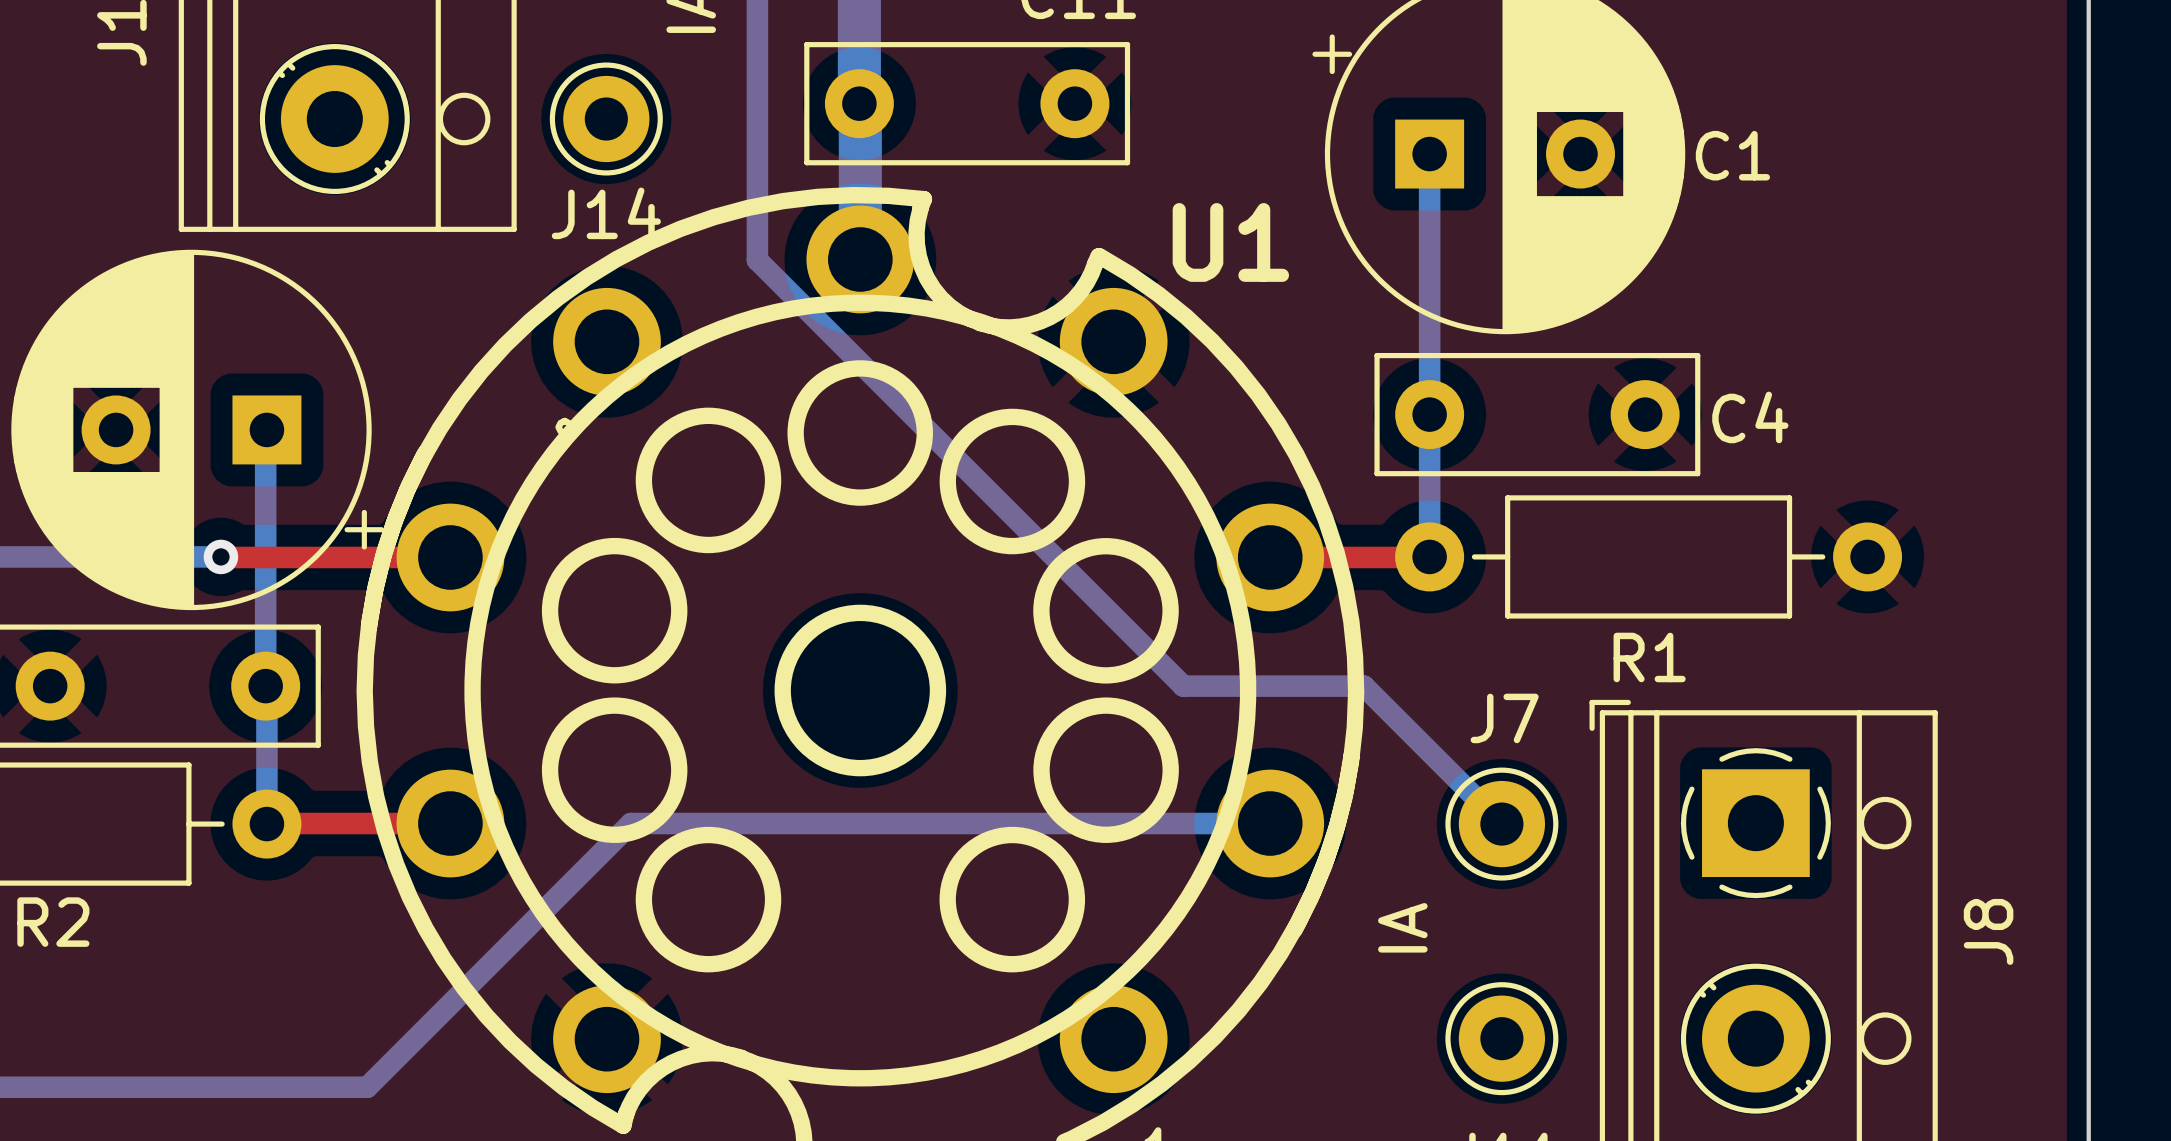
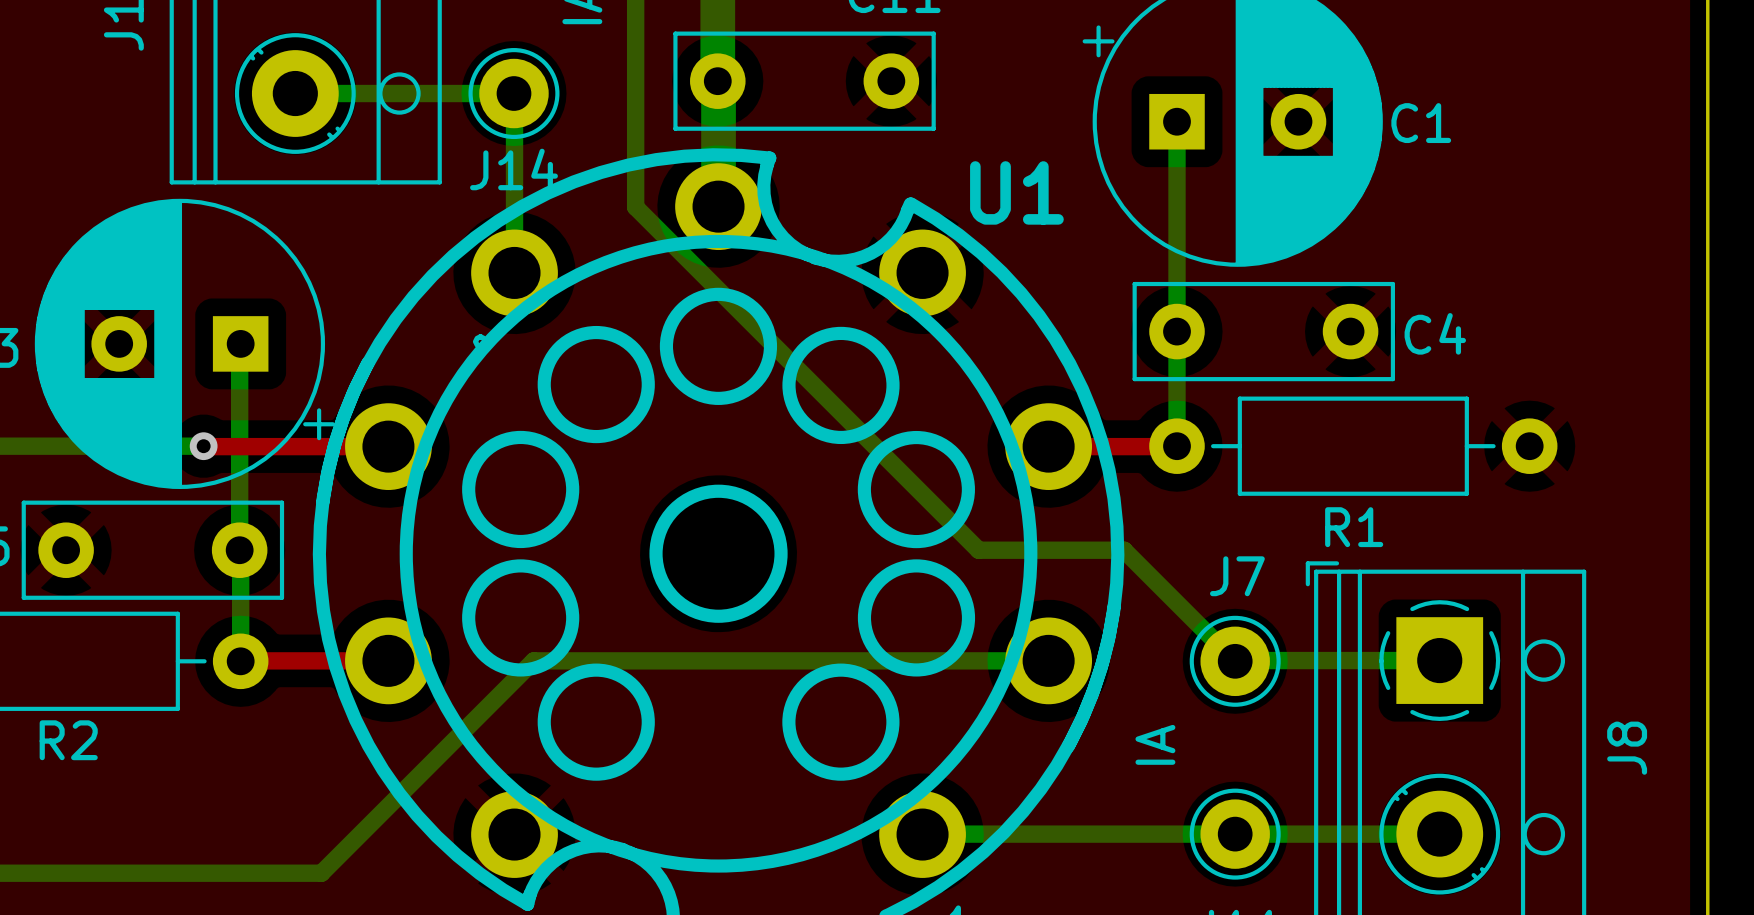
bottom track: none -> (295, 93) (513, 93) (514, 272)
bottom track: none -> (1439, 660) (1235, 661)
bottom track: none -> (923, 834) (1439, 834)

